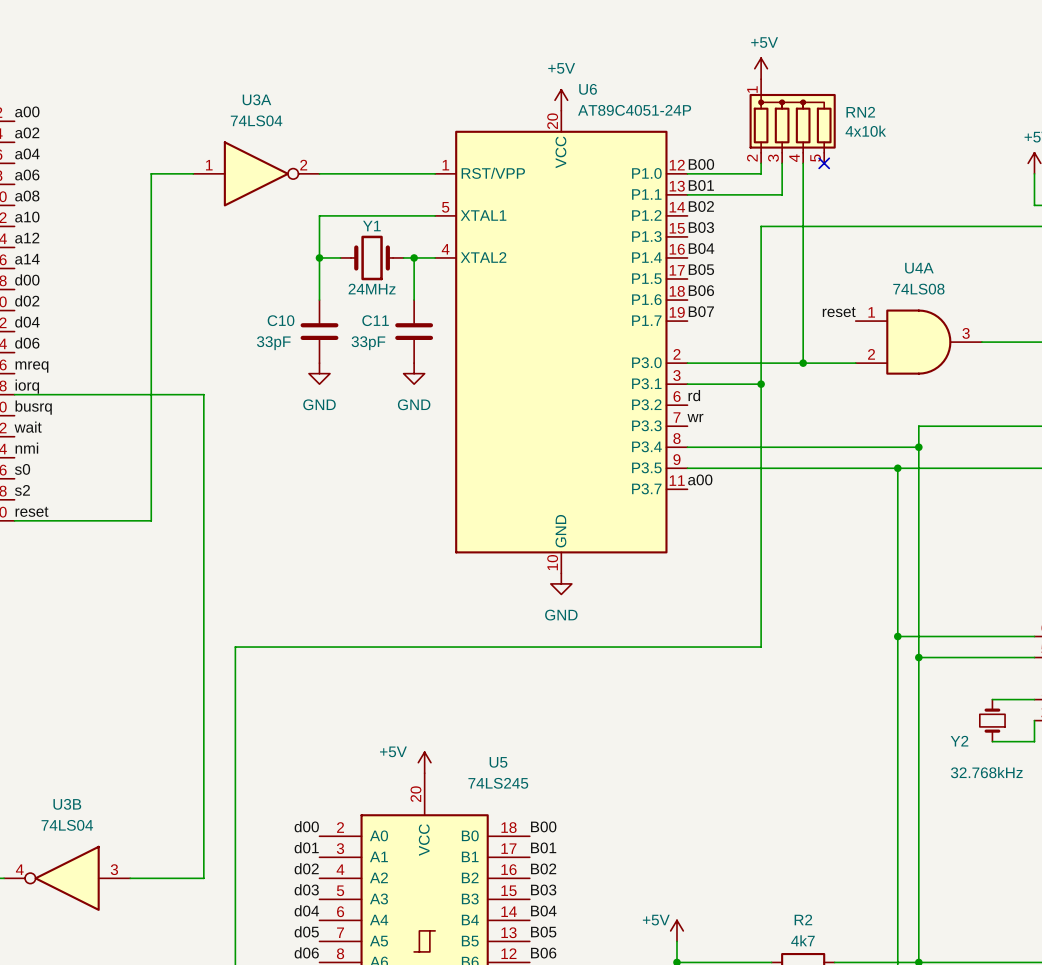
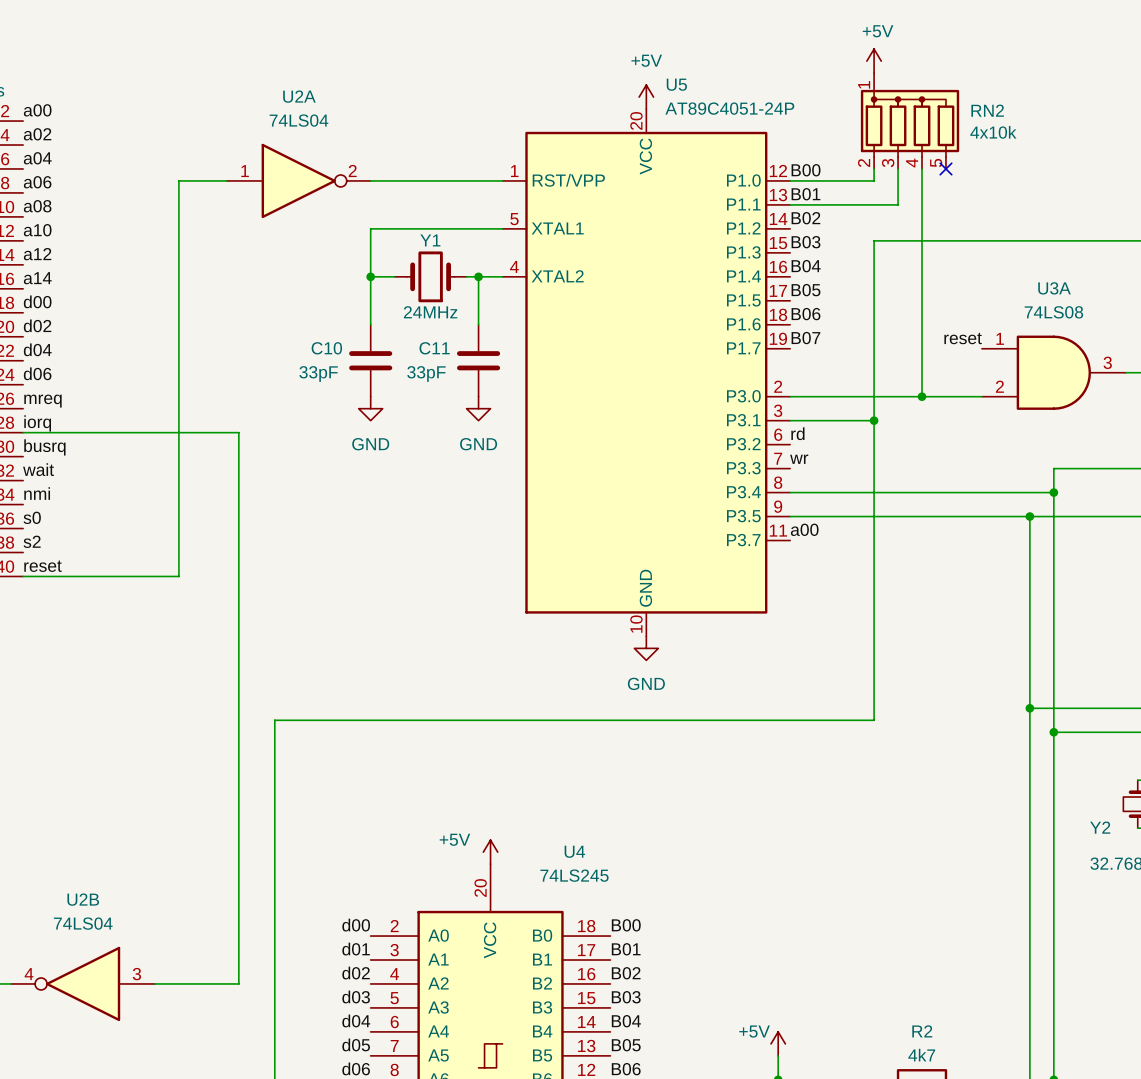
U6 name: U6 (588, 89) -> U5 (676, 84)
U3A name: U3A (256, 99) -> U2A (299, 96)
U4A name: U4A (919, 268) -> U3A (1054, 288)
U5 name: U5 (498, 762) -> U4 (574, 851)
U3B name: U3B (67, 804) -> U2B (83, 899)

